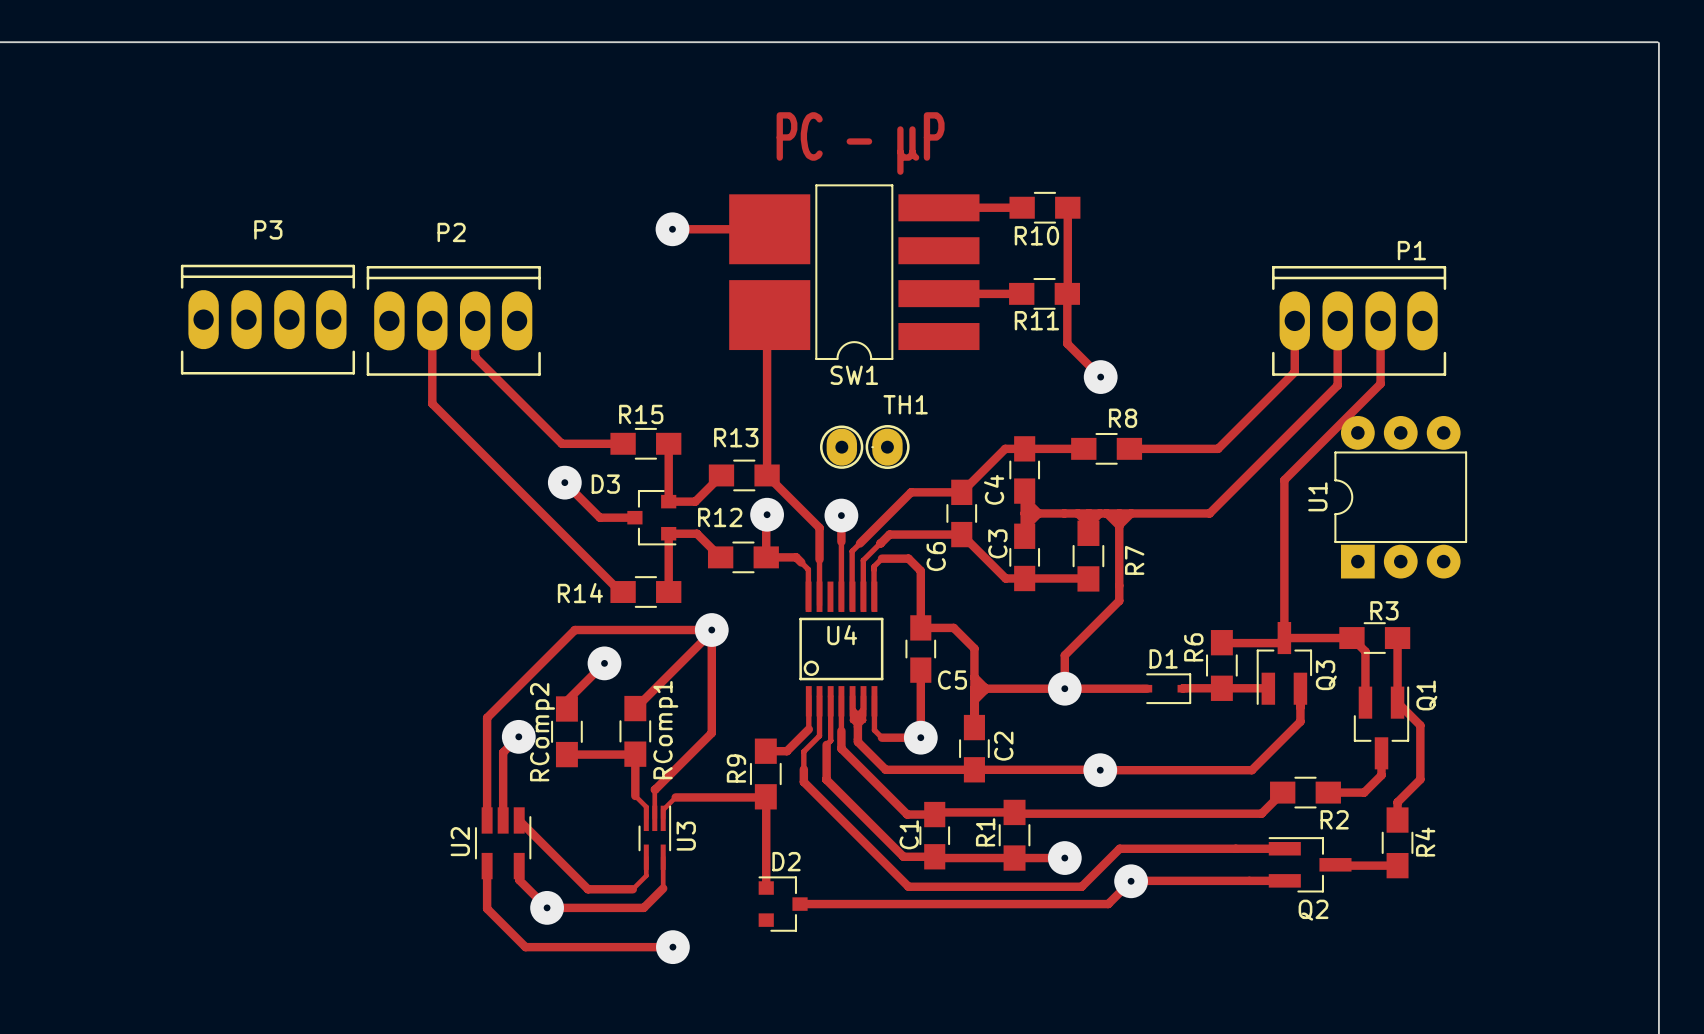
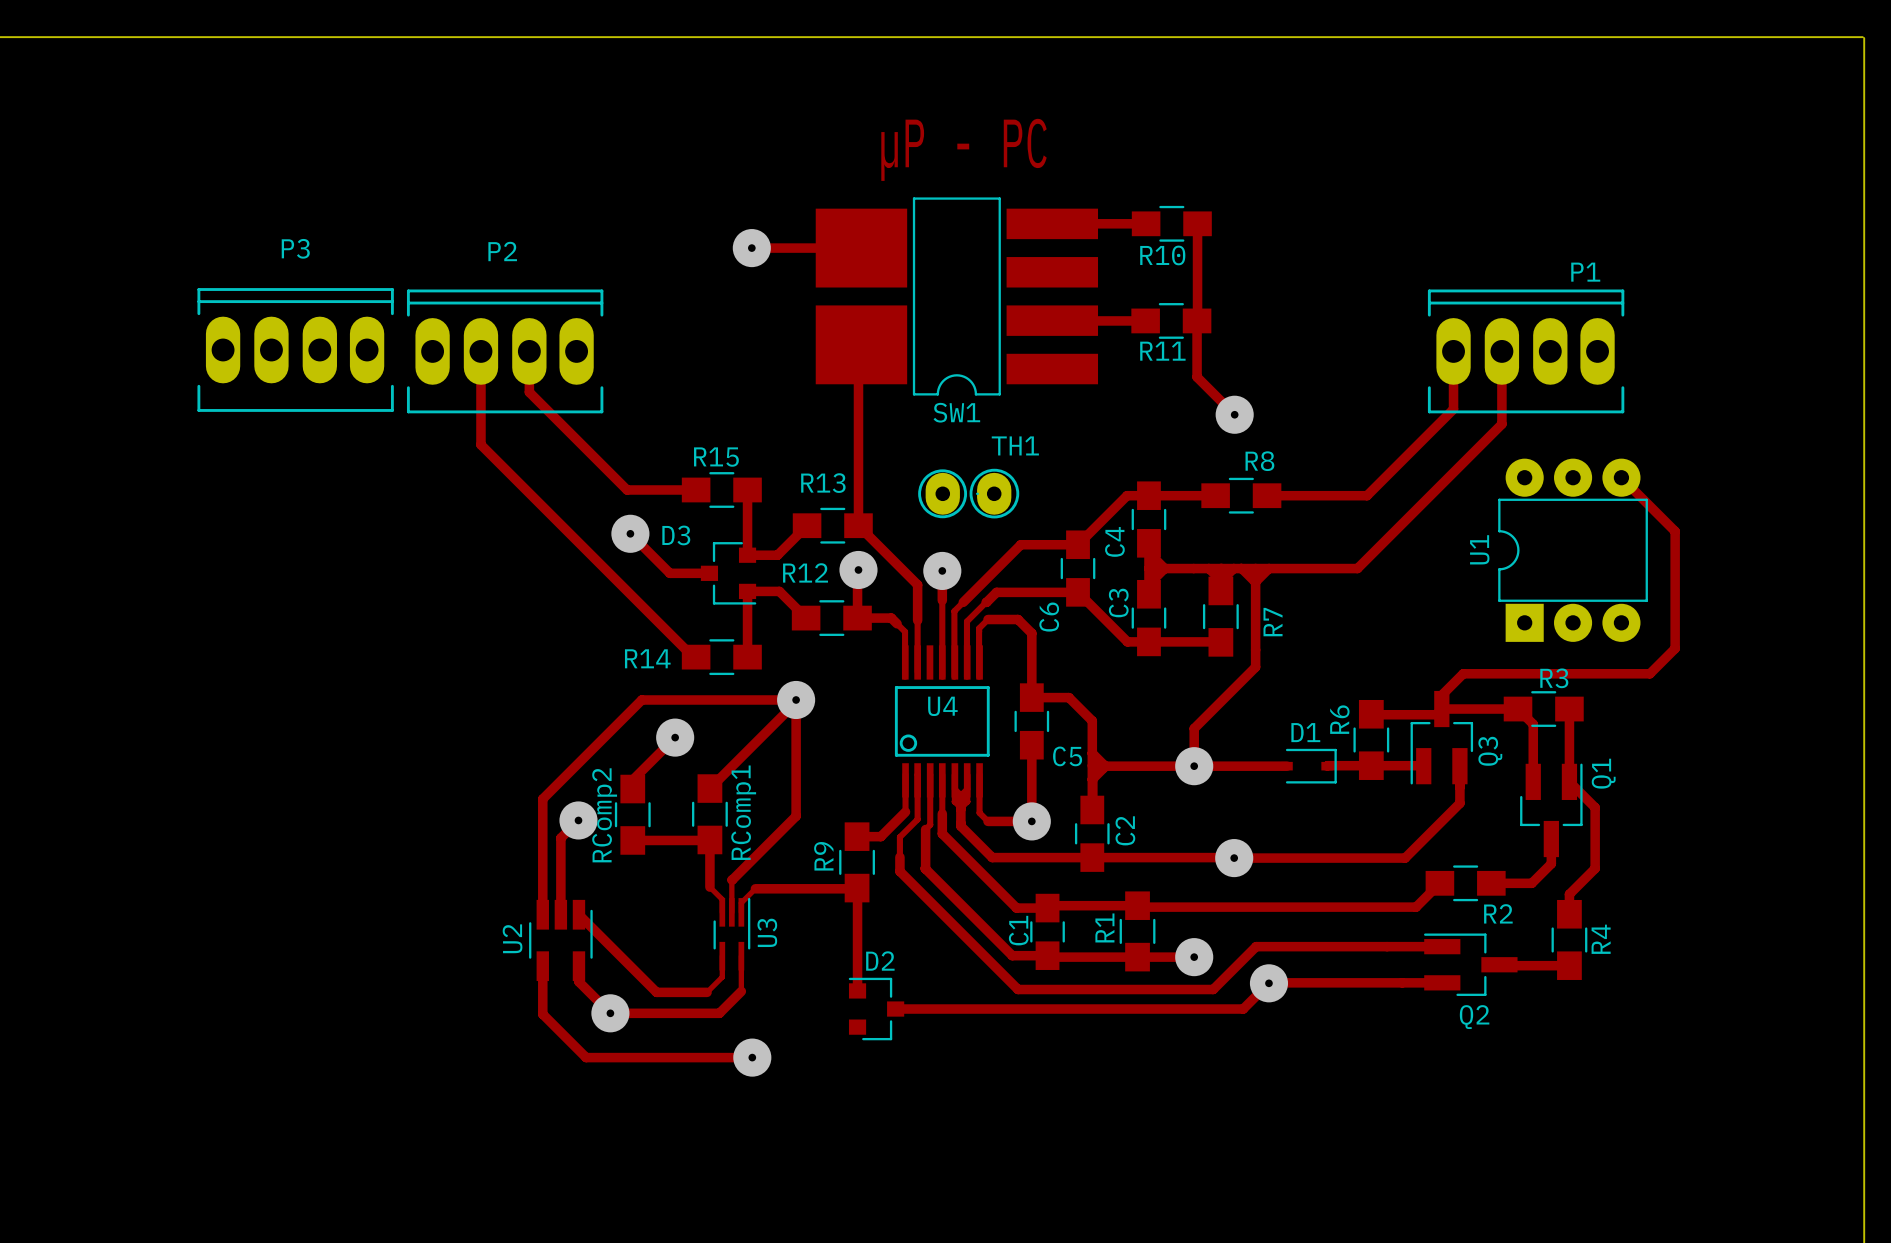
text: PC - µP (860, 143) -> µP - PC (963, 149)
track: (1380, 320) (1380, 383) (1284, 480) (1284, 625) -> (1621, 477) (1675, 531) (1675, 648) (1649, 673) (1463, 673) (1441, 695)

